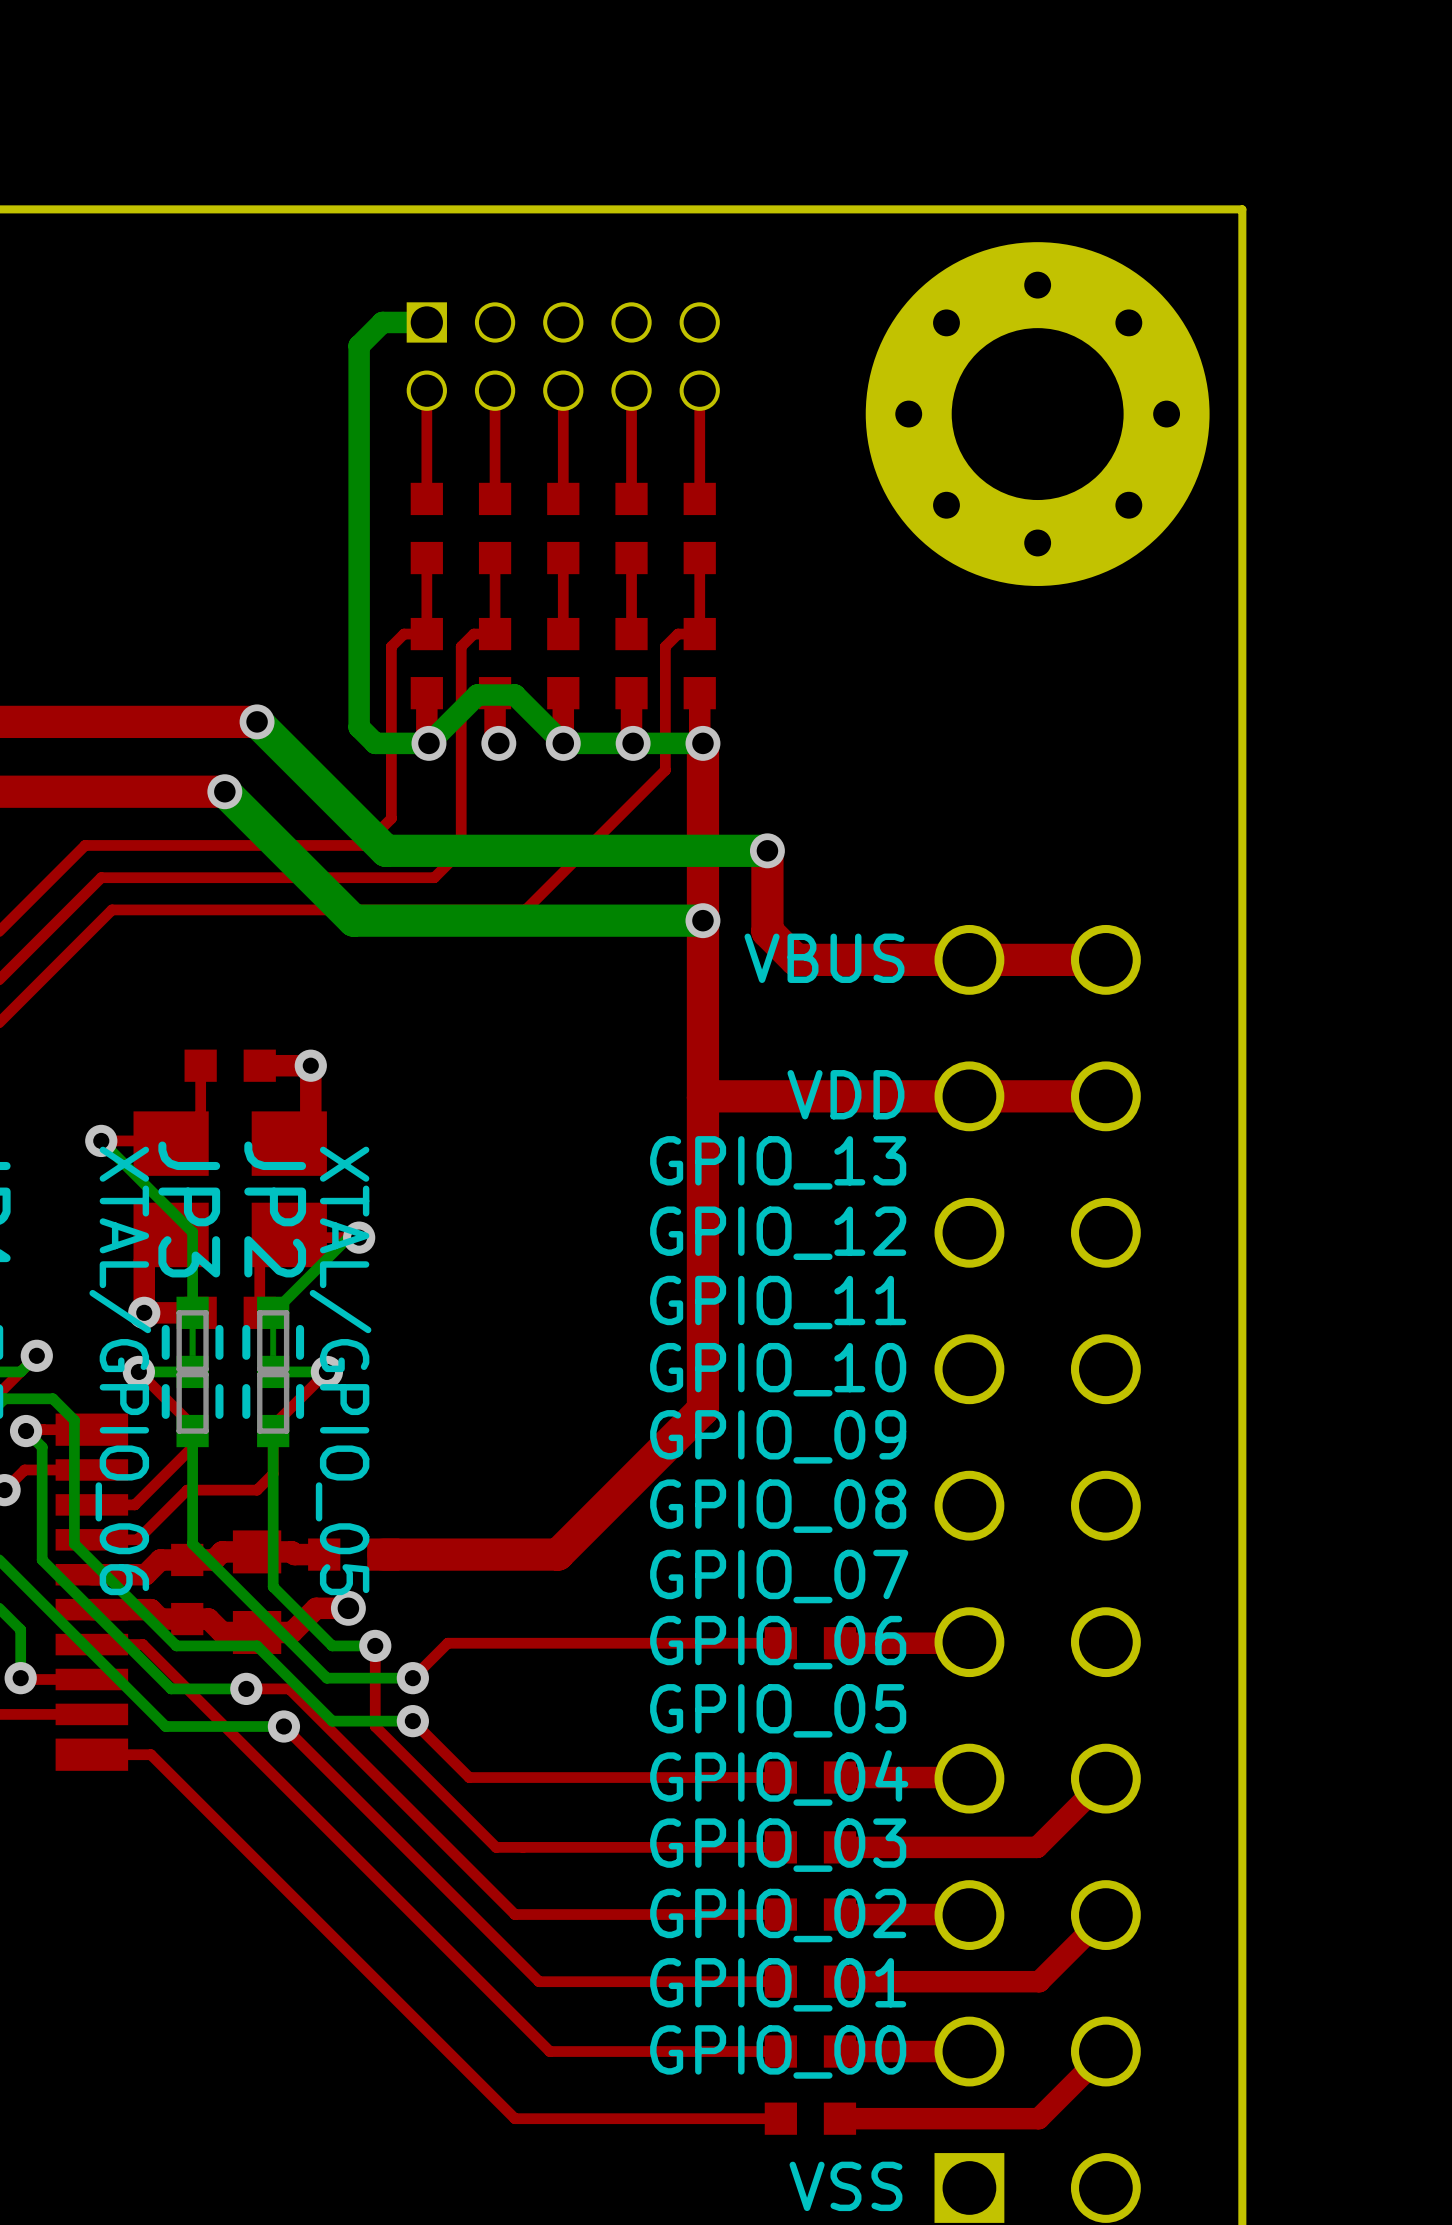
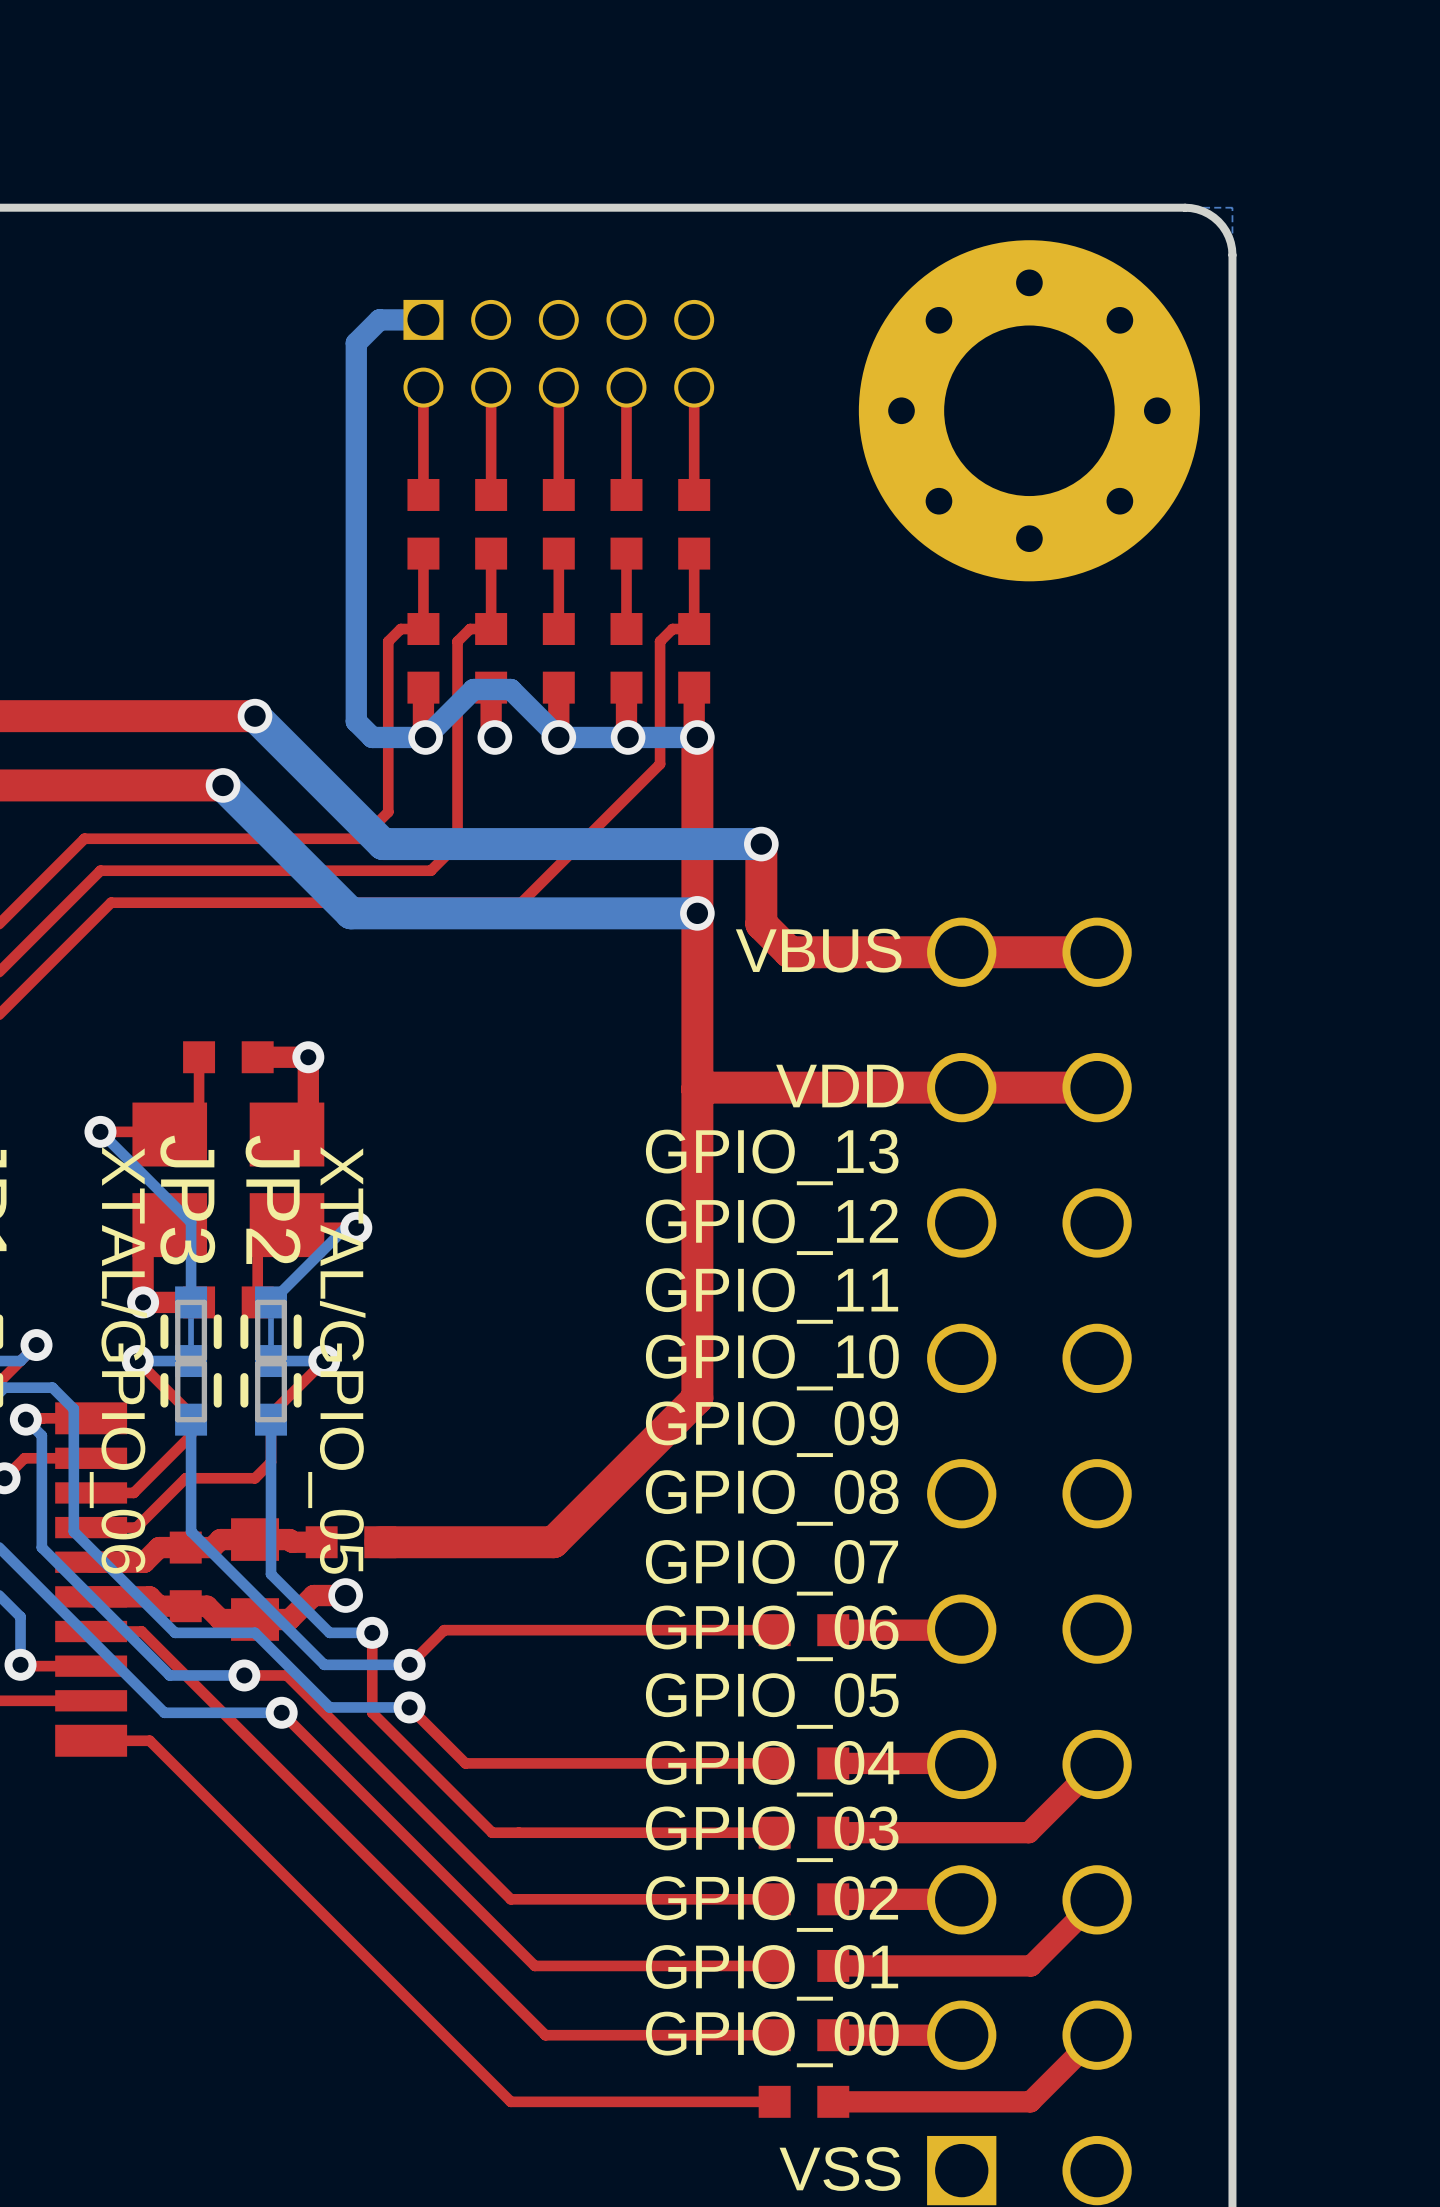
board edge: (1194, 209) (1242, 209) (1242, 257) -> (1185, 207) (1203, 211) (1218, 221) (1228, 236) (1232, 255)

